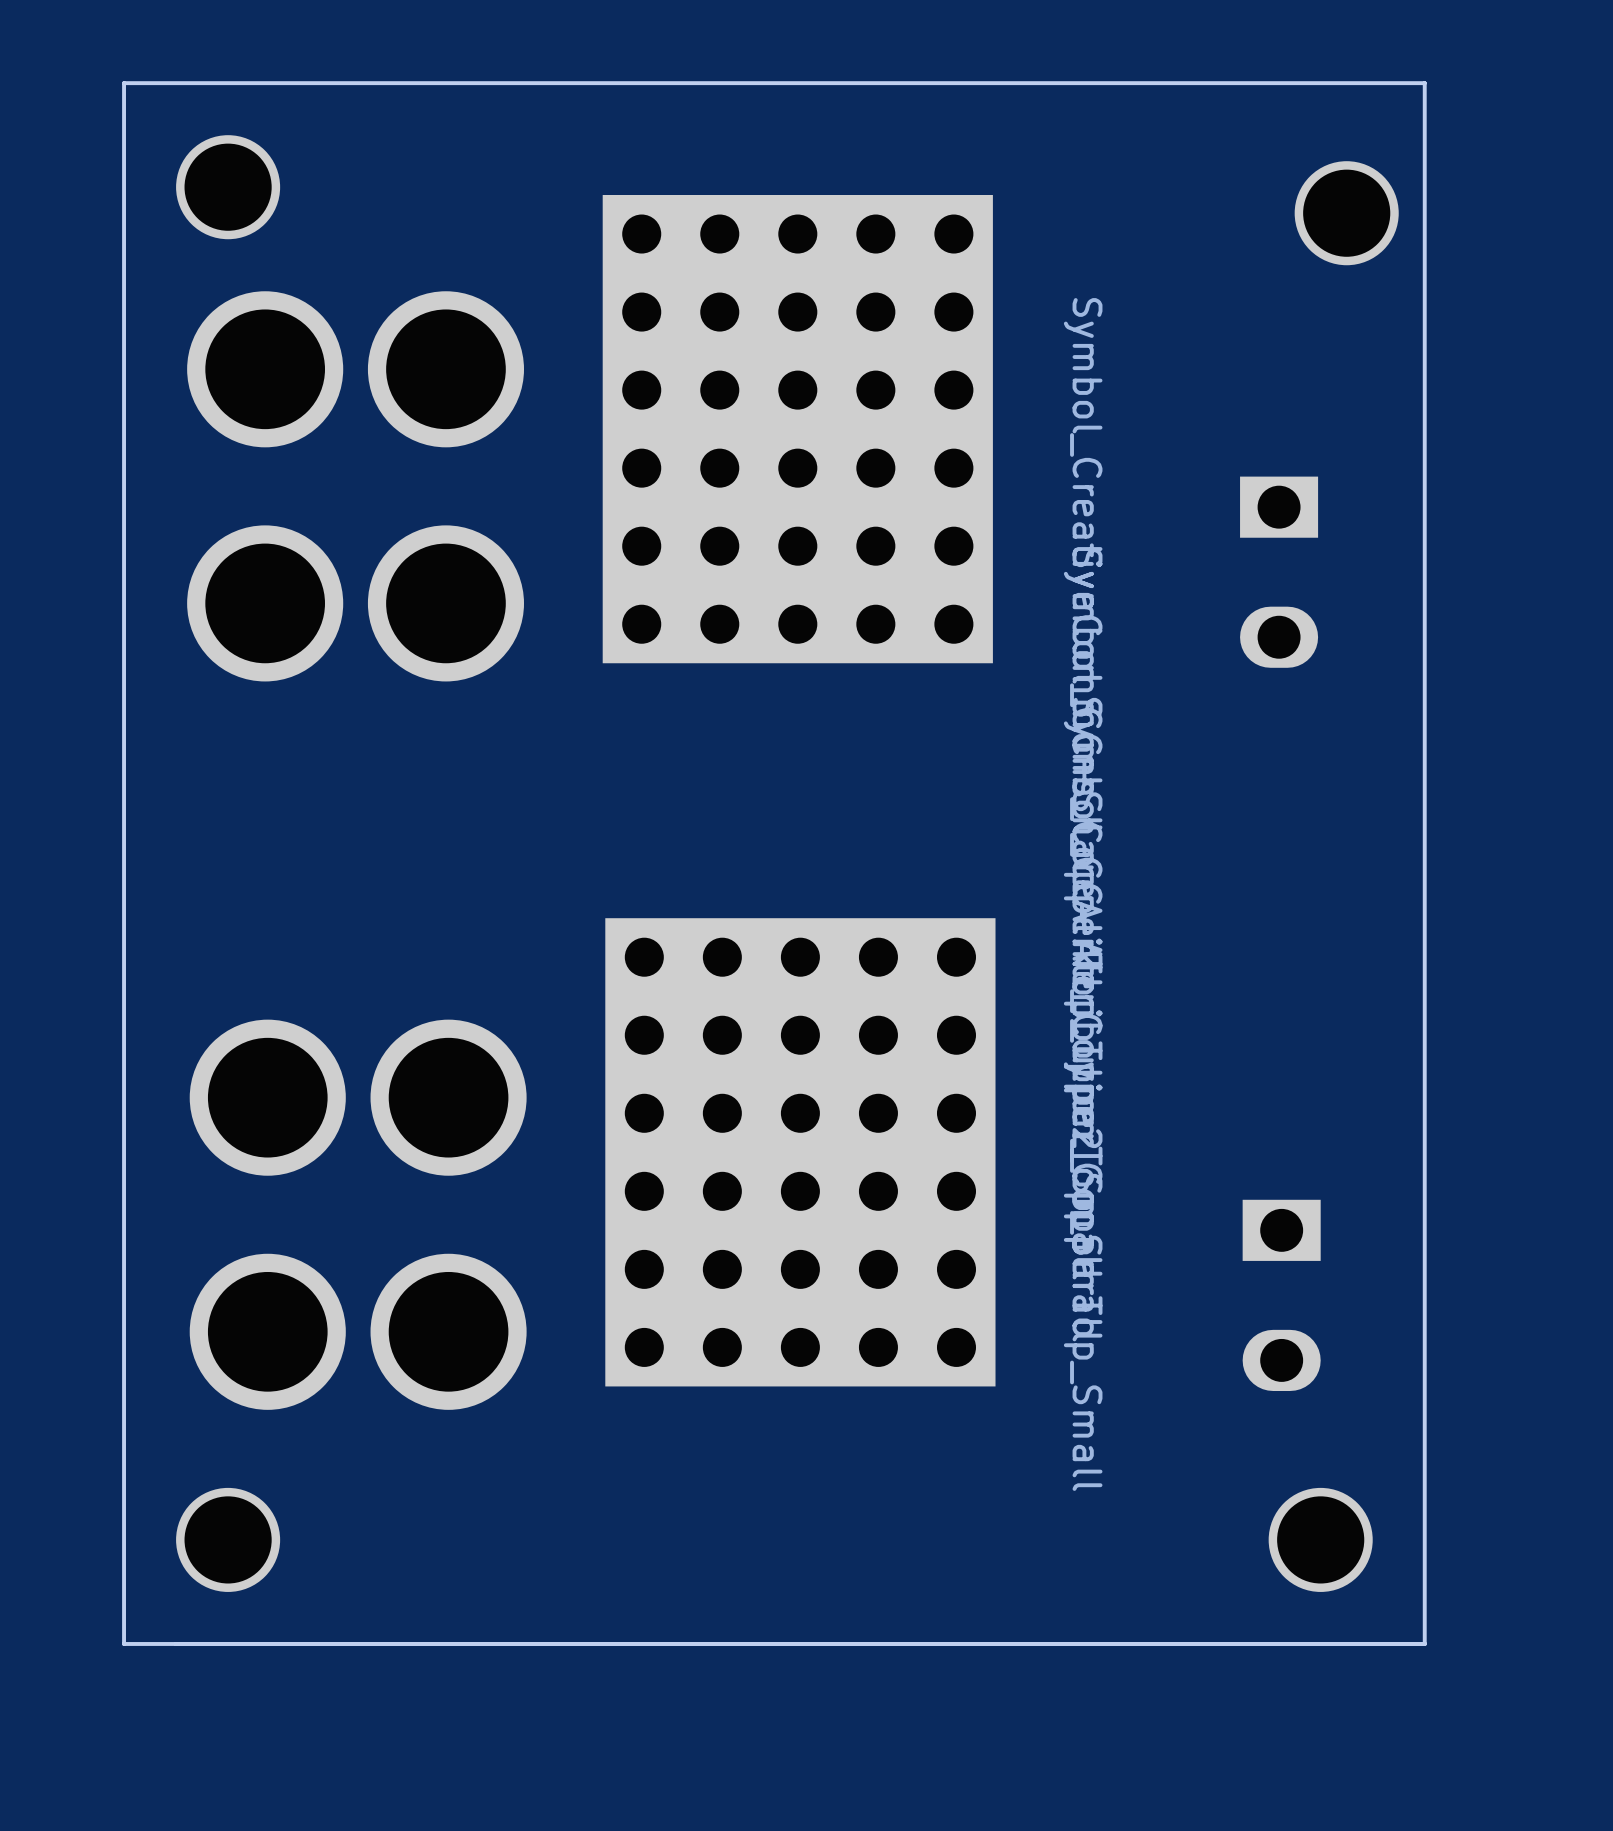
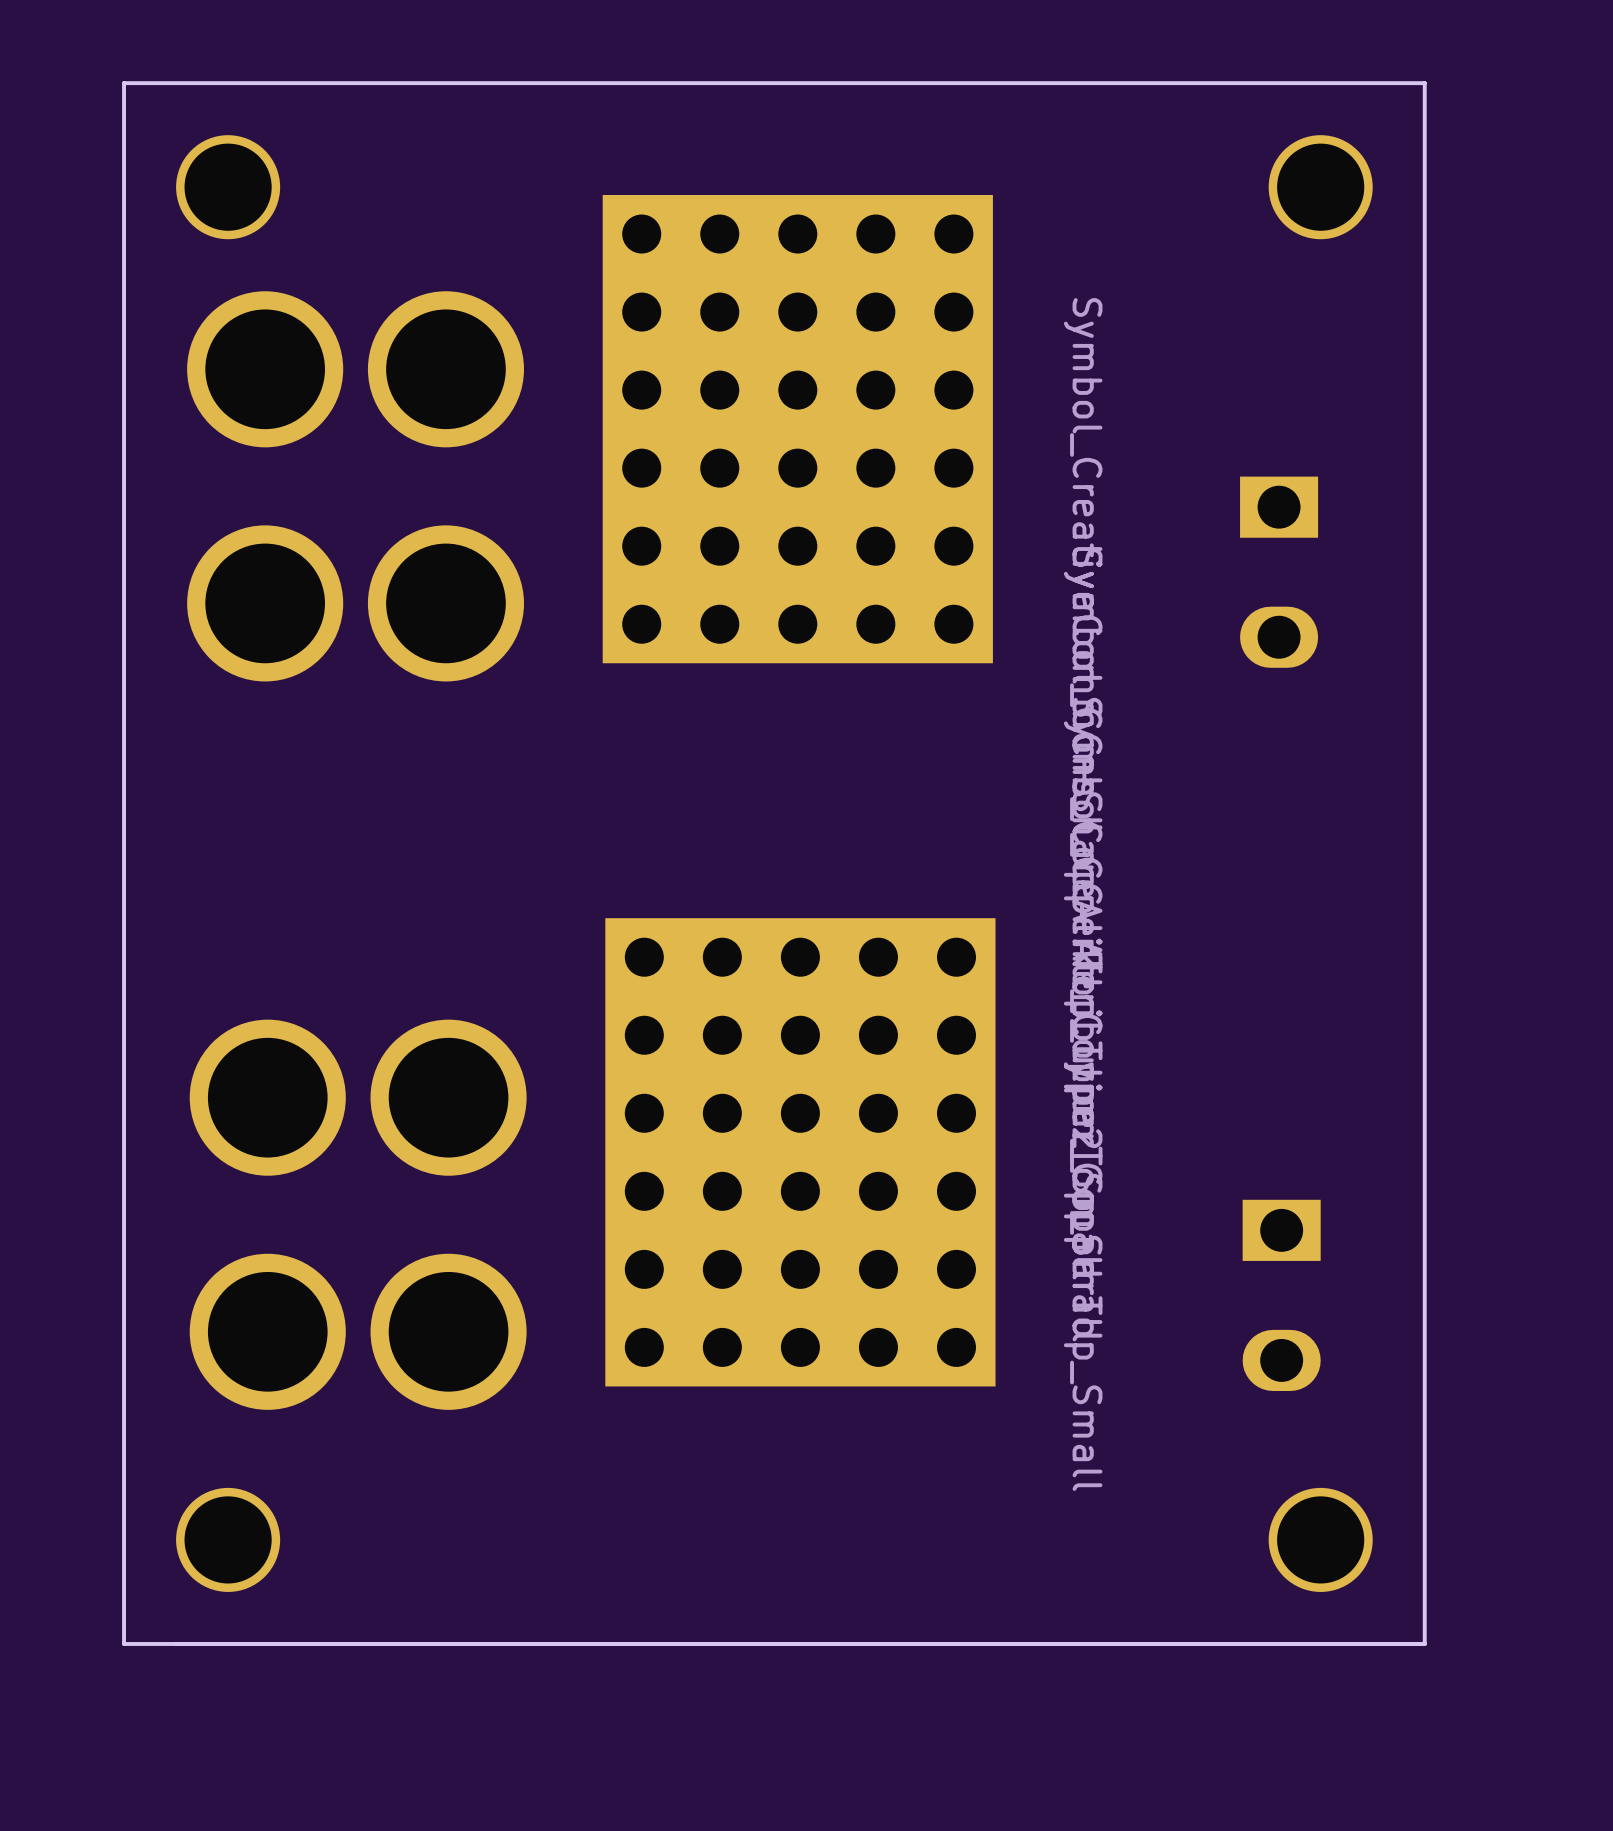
part position: (1346, 213) -> (1320, 187)

